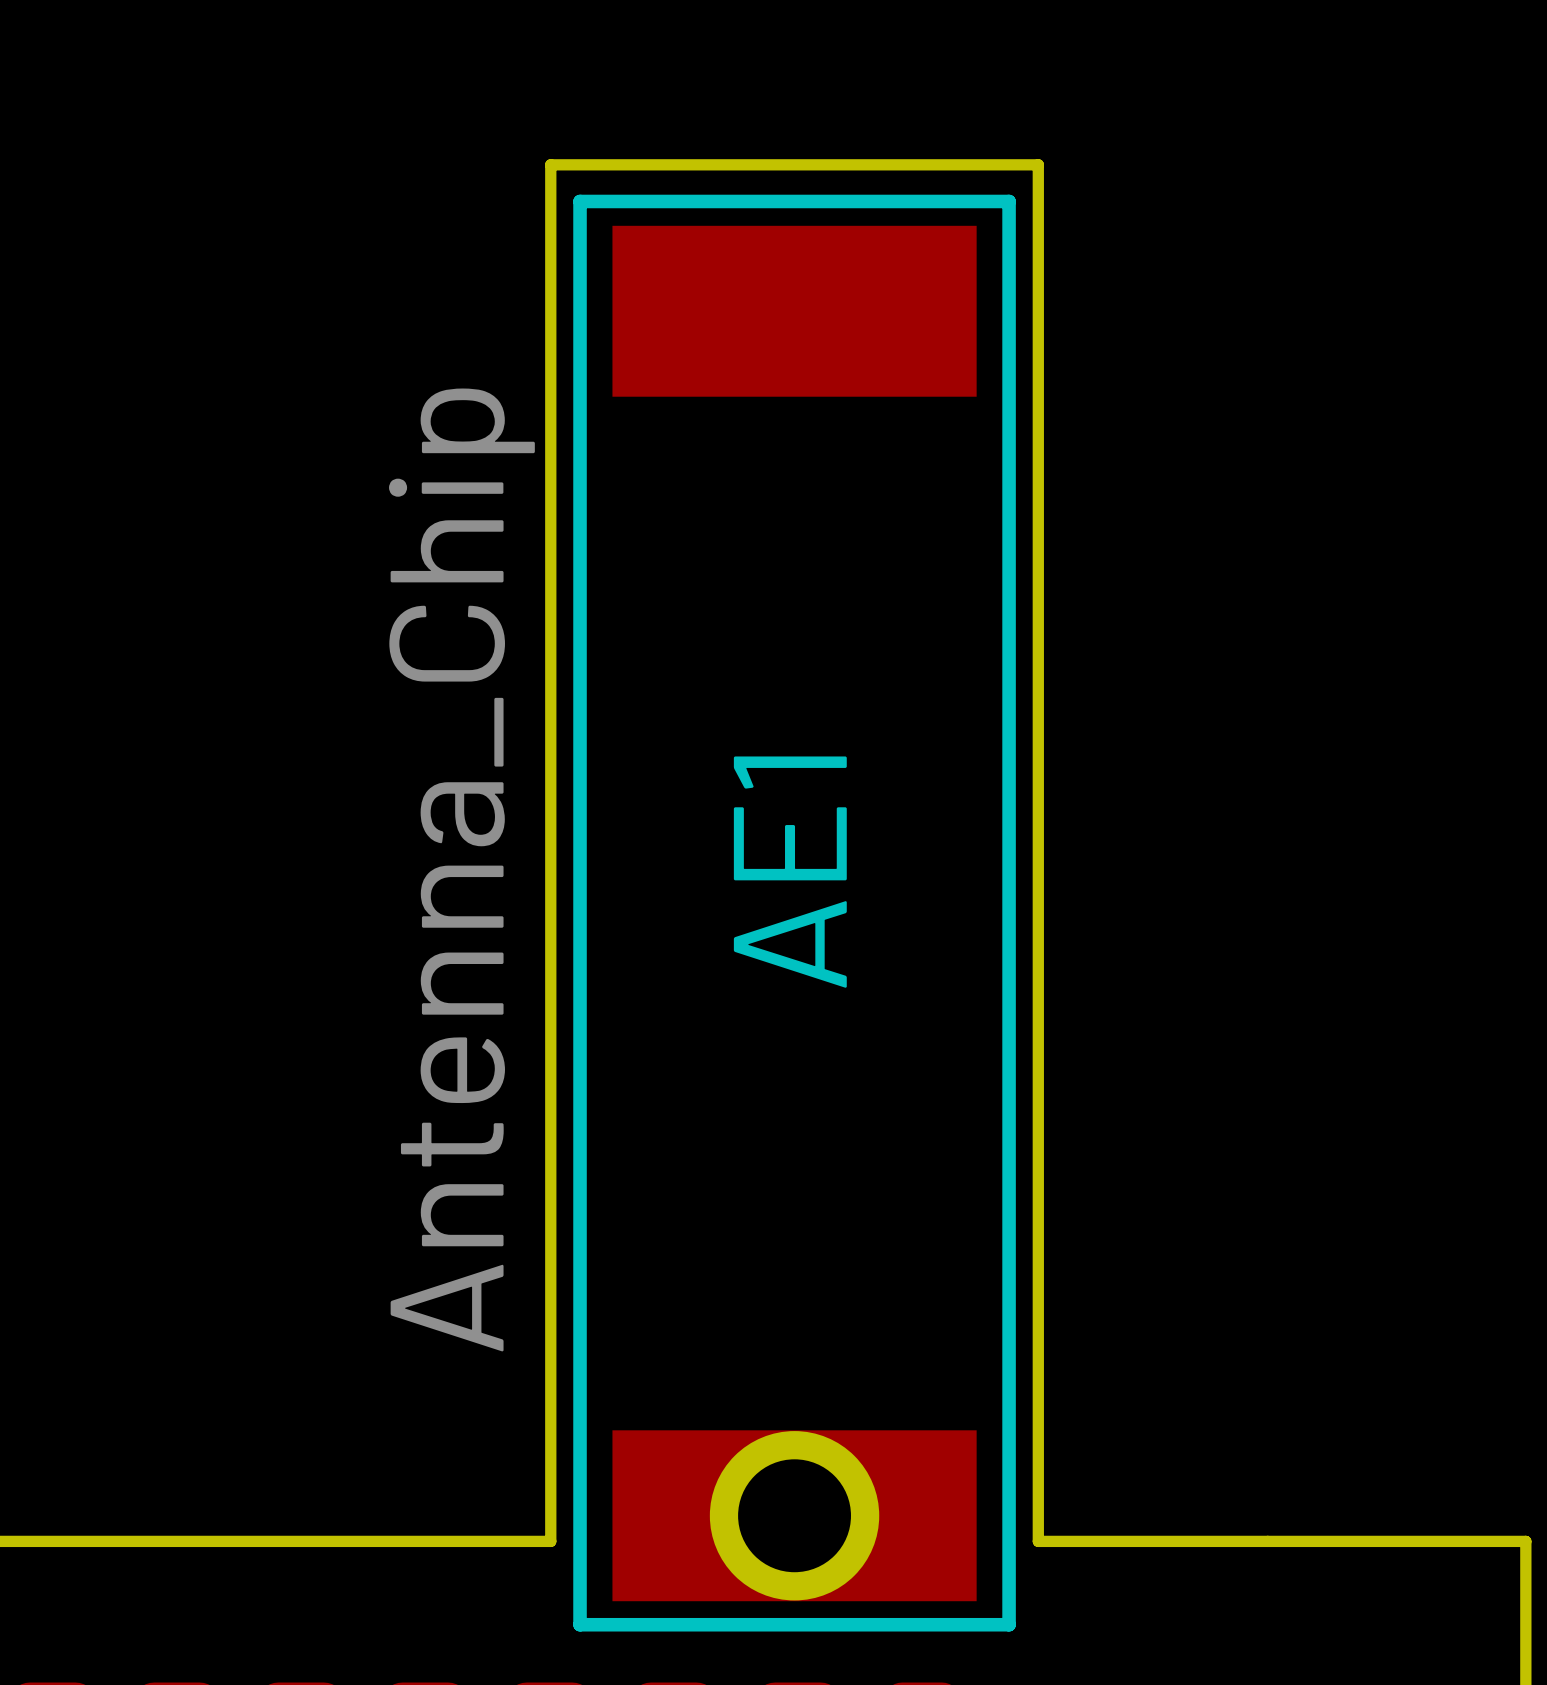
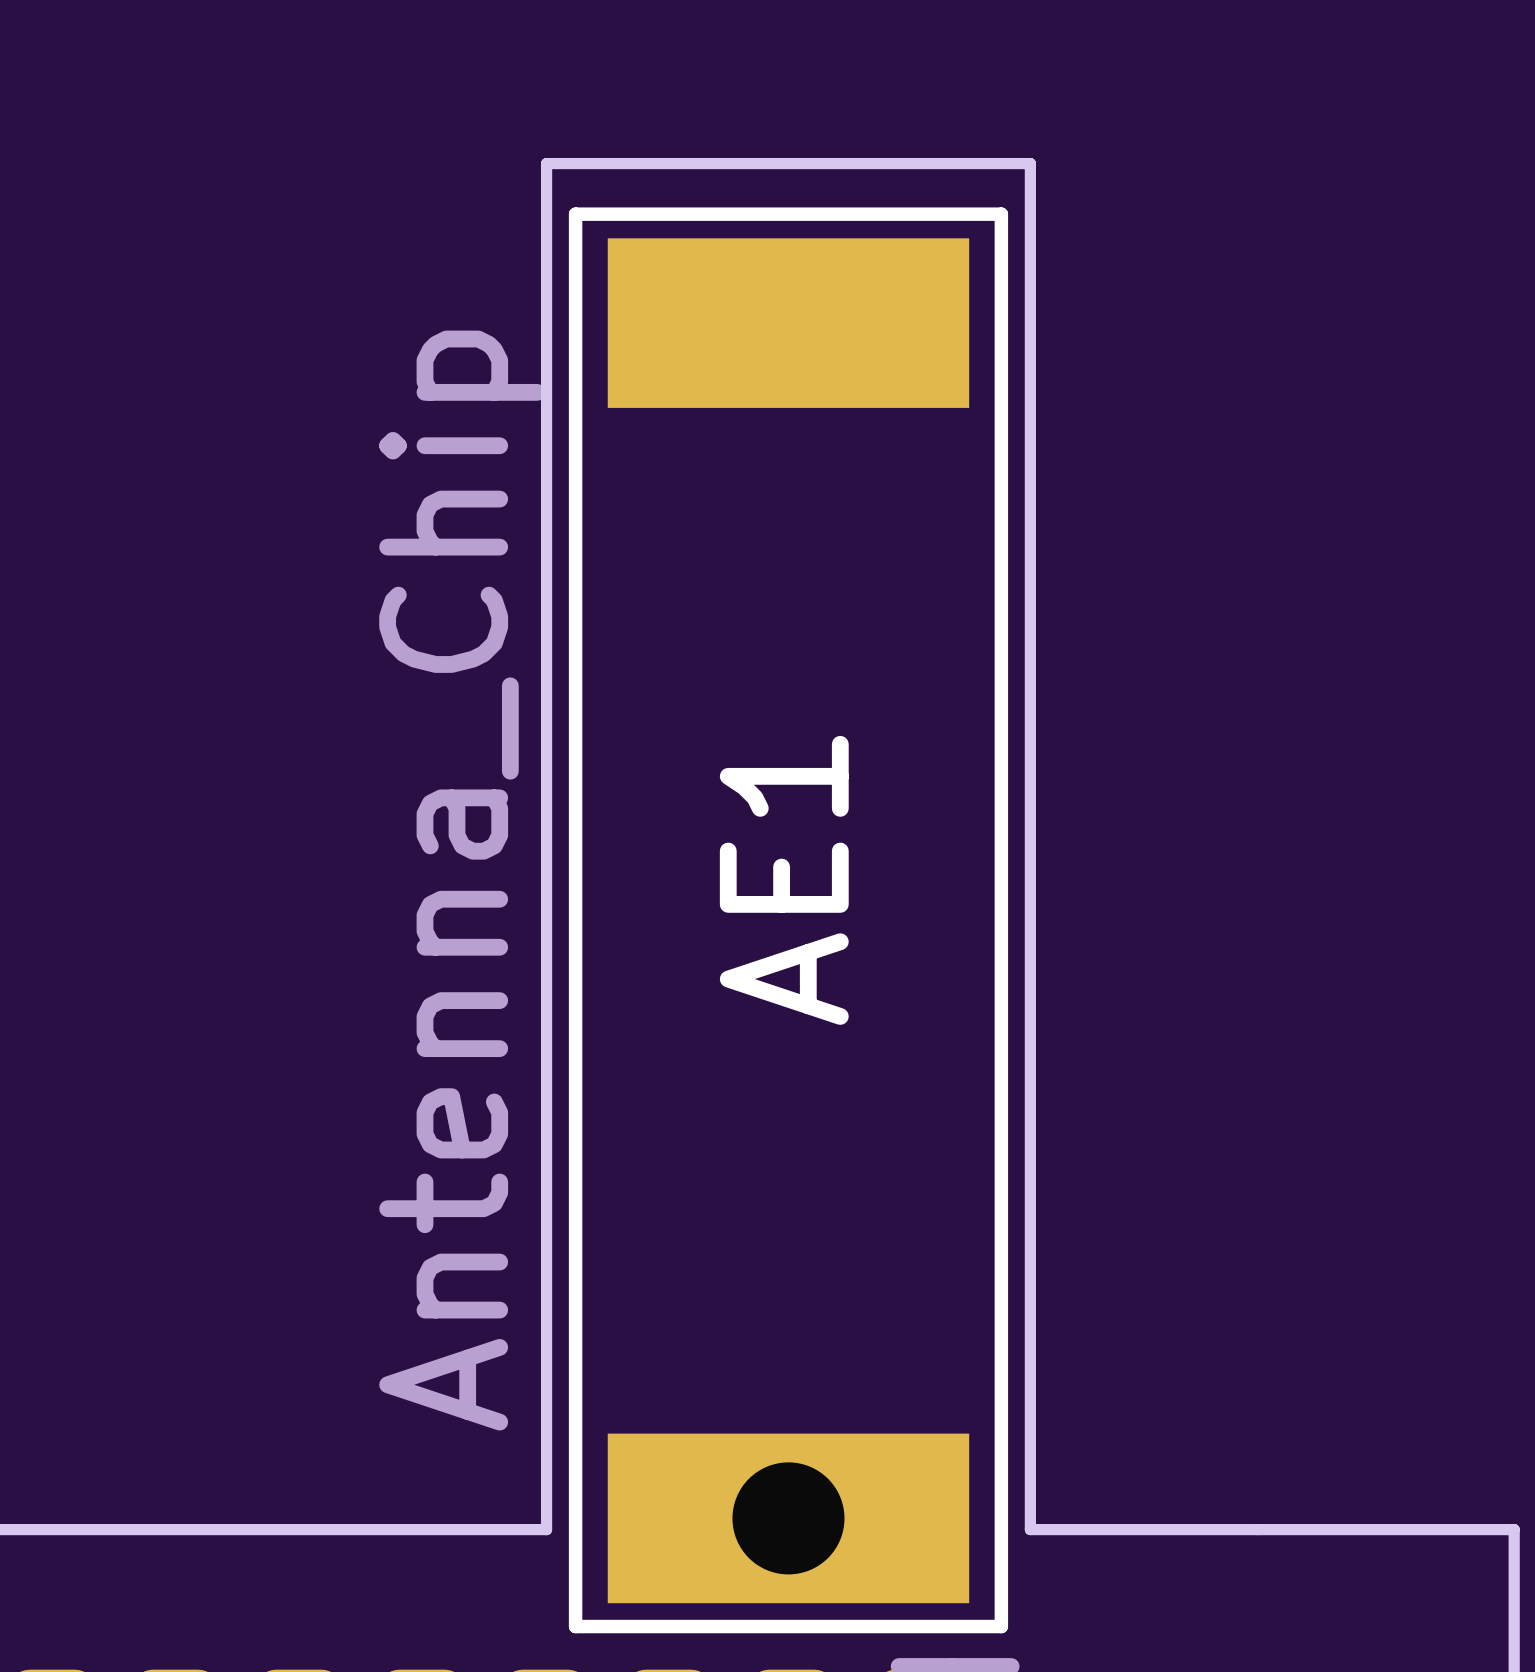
AE1 position: (794, 913) -> (788, 920)

